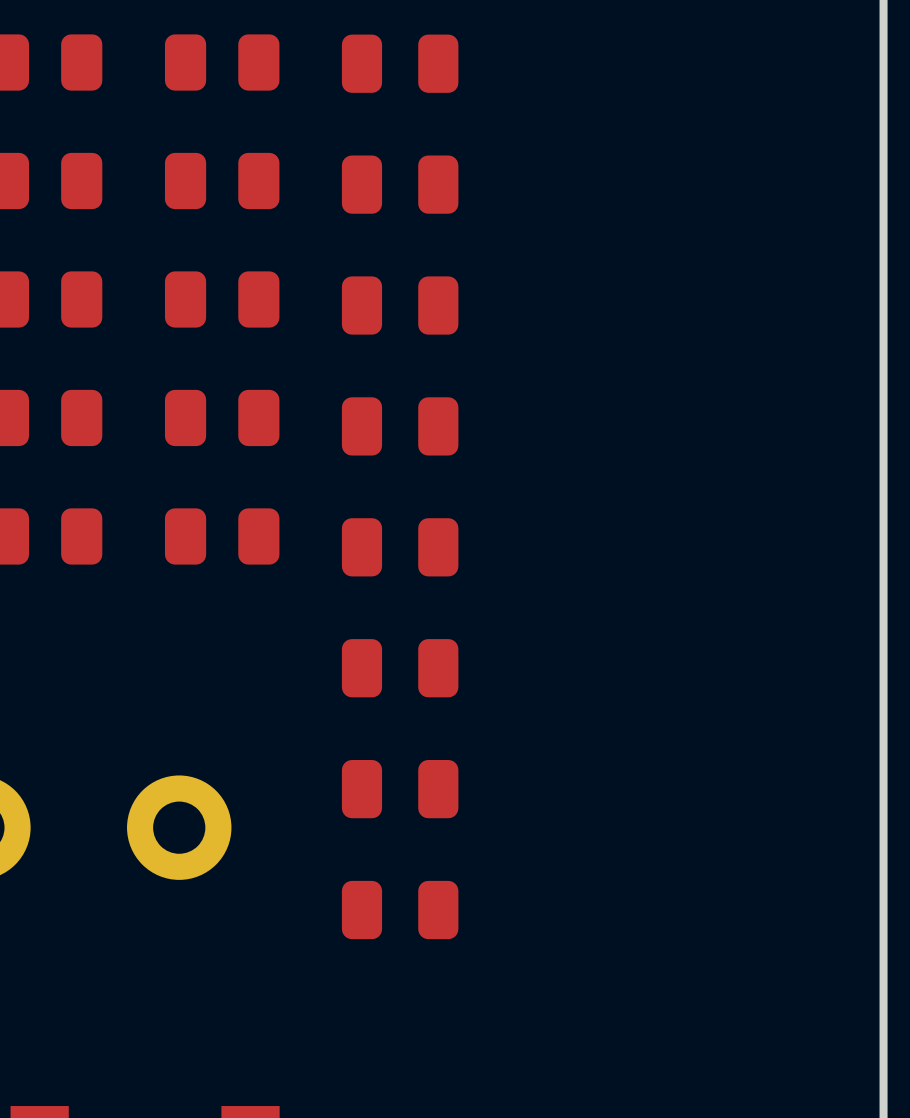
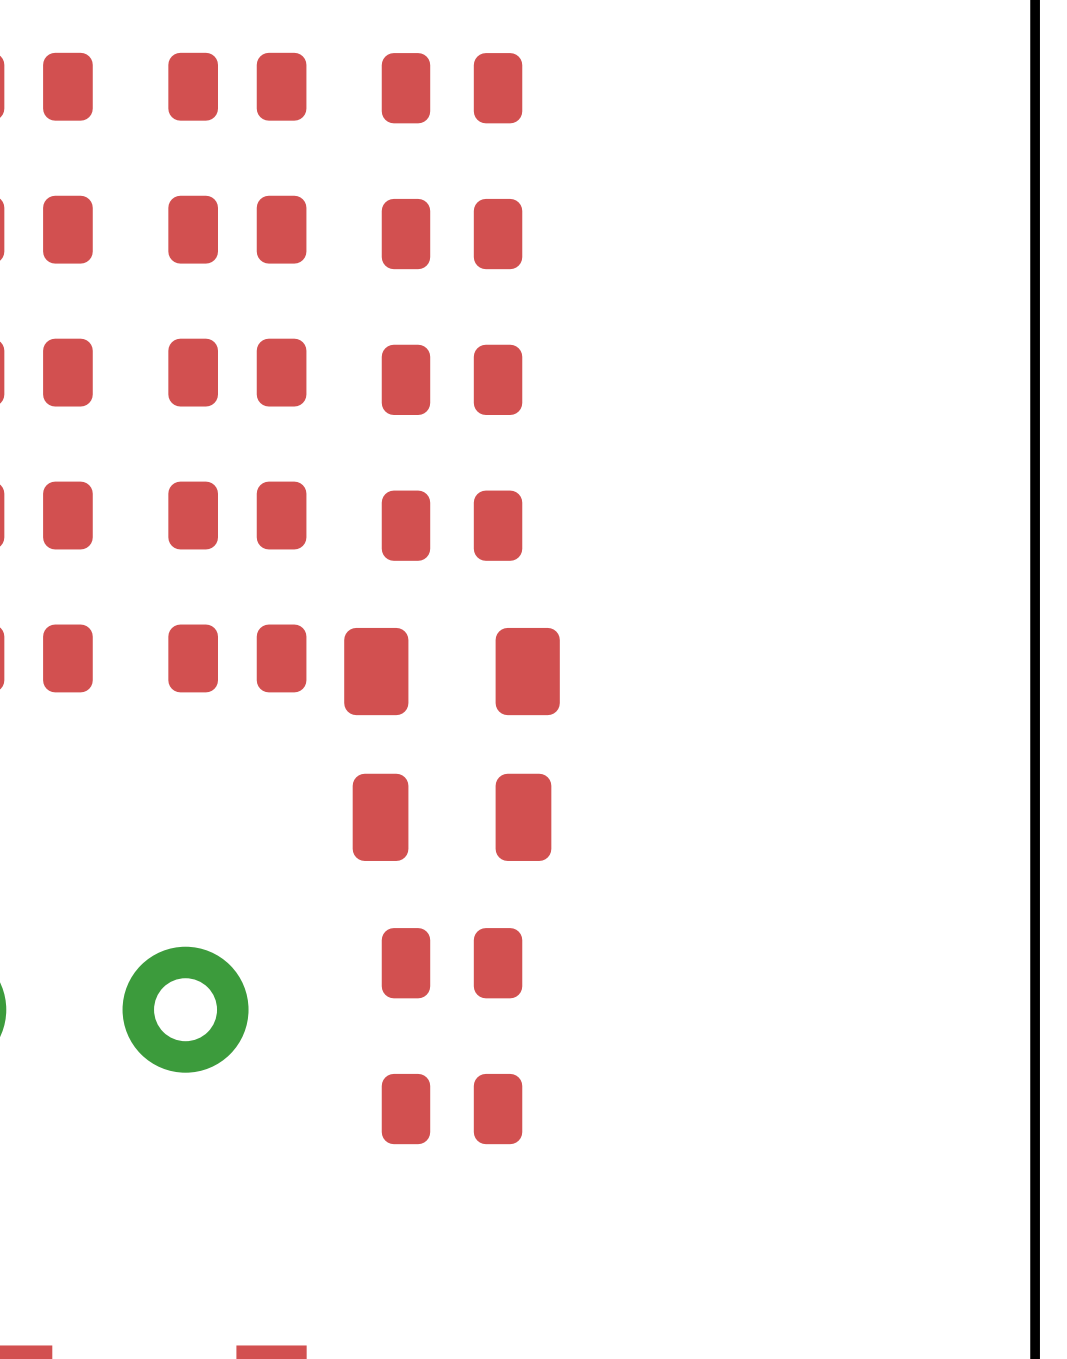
part footprint: [341, 518, 459, 577] -> [344, 627, 560, 716]
part footprint: [341, 639, 459, 698] -> [352, 773, 552, 861]

